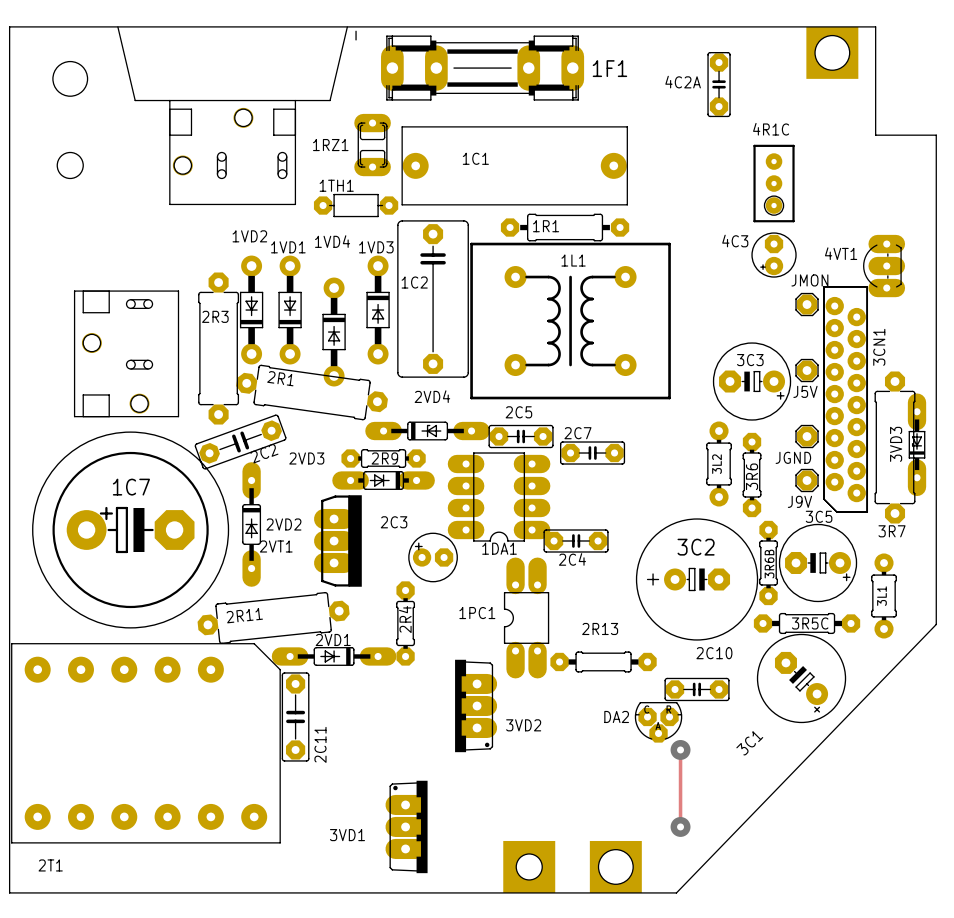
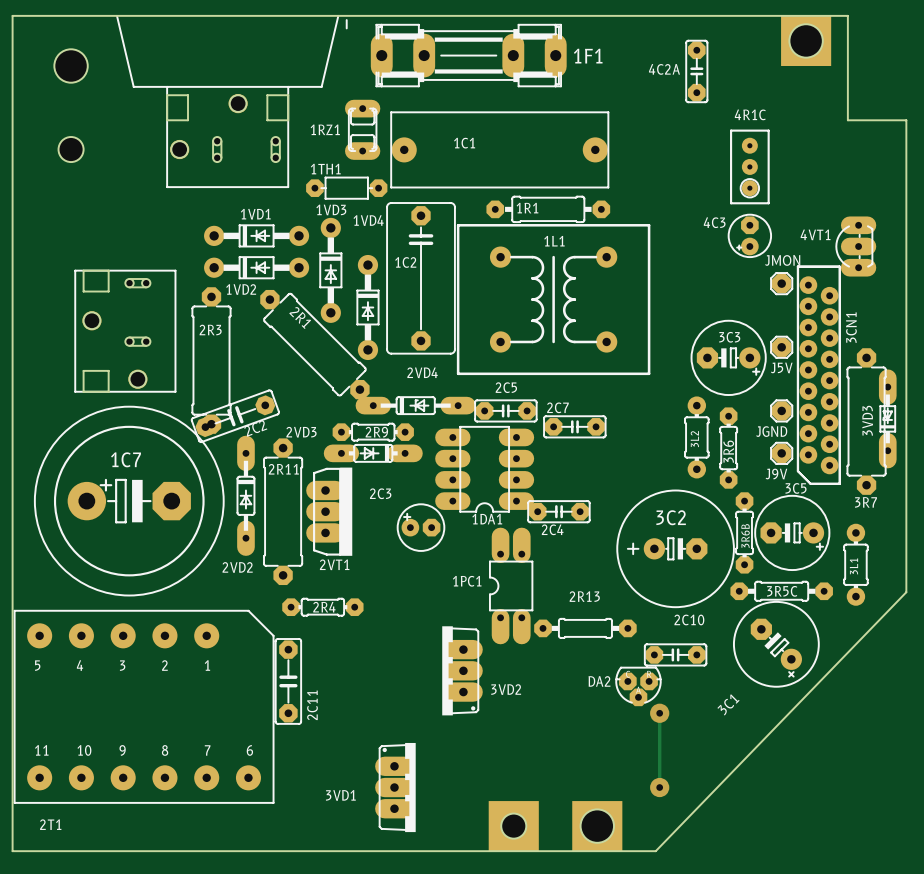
1VD2 name position: 1VD2 (249, 236) -> 1VD2 (241, 289)
1VD1 name position: 1VD1 (288, 247) -> 1VD1 (255, 214)
1VD2 rotation: 0° (251, 310) -> 90° clockwise (256, 267)
1VD1 rotation: 0° (290, 310) -> 90° clockwise (256, 235)
1VD3 position: (378, 310) -> (330, 270)
1VD4 position: (334, 332) -> (367, 307)
2R3 position: (218, 348) -> (211, 360)
2R1 rotation: 0° (312, 392) -> 37° clockwise (314, 344)
2VD2 name position: 2VD2 (283, 524) -> 2VD2 (237, 567)
2VT1 name position: 2VT1 (276, 546) -> 2VT1 (334, 564)
2R11 name position: 2R11 (244, 615) -> 2R11 (283, 469)
2R11 rotation: 0° (273, 617) -> 84° counterclockwise (283, 511)
2R4 rotation: 0° (405, 623) -> 90° clockwise (322, 607)
2R4 position: (405, 623) -> (322, 607)
2T1 footprint: [11, 643, 281, 844] -> [14, 610, 275, 804]
2VD1: (334, 656) -> none

